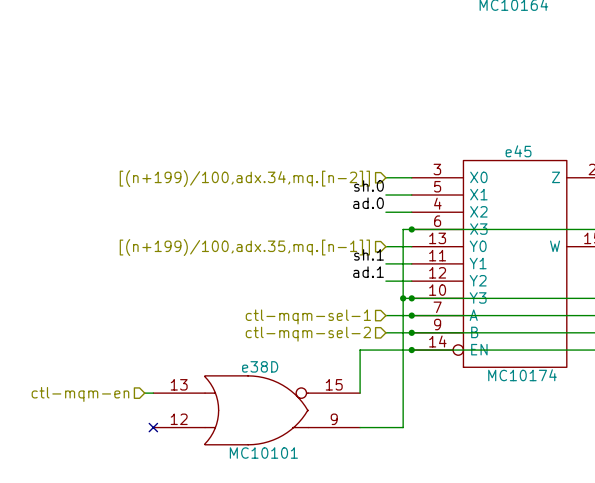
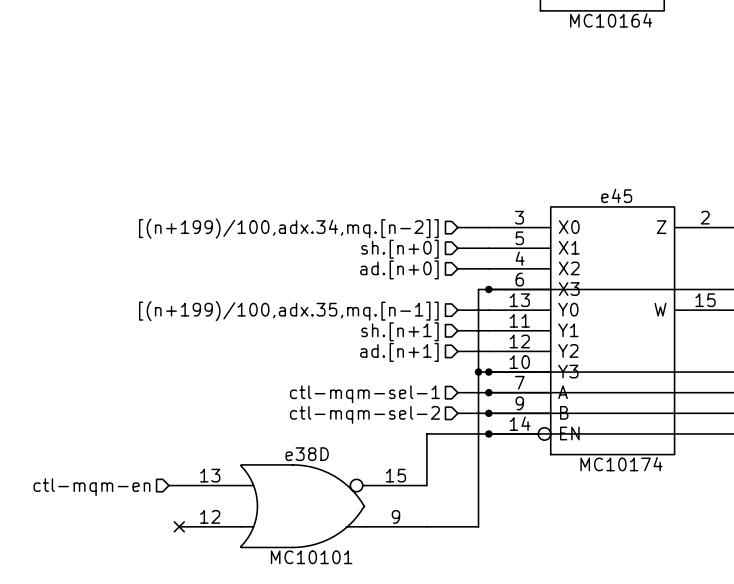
label: sh.0 (369, 185) -> none
hierarchical label: none -> sh.[n+0] (400, 249)
label: ad.0 (368, 203) -> none
hierarchical label: none -> ad.[n+0] (399, 269)
label: sh.1 (369, 254) -> none
hierarchical label: none -> sh.[n+1] (400, 331)
label: ad.1 (368, 272) -> none
hierarchical label: none -> ad.[n+1] (399, 352)

